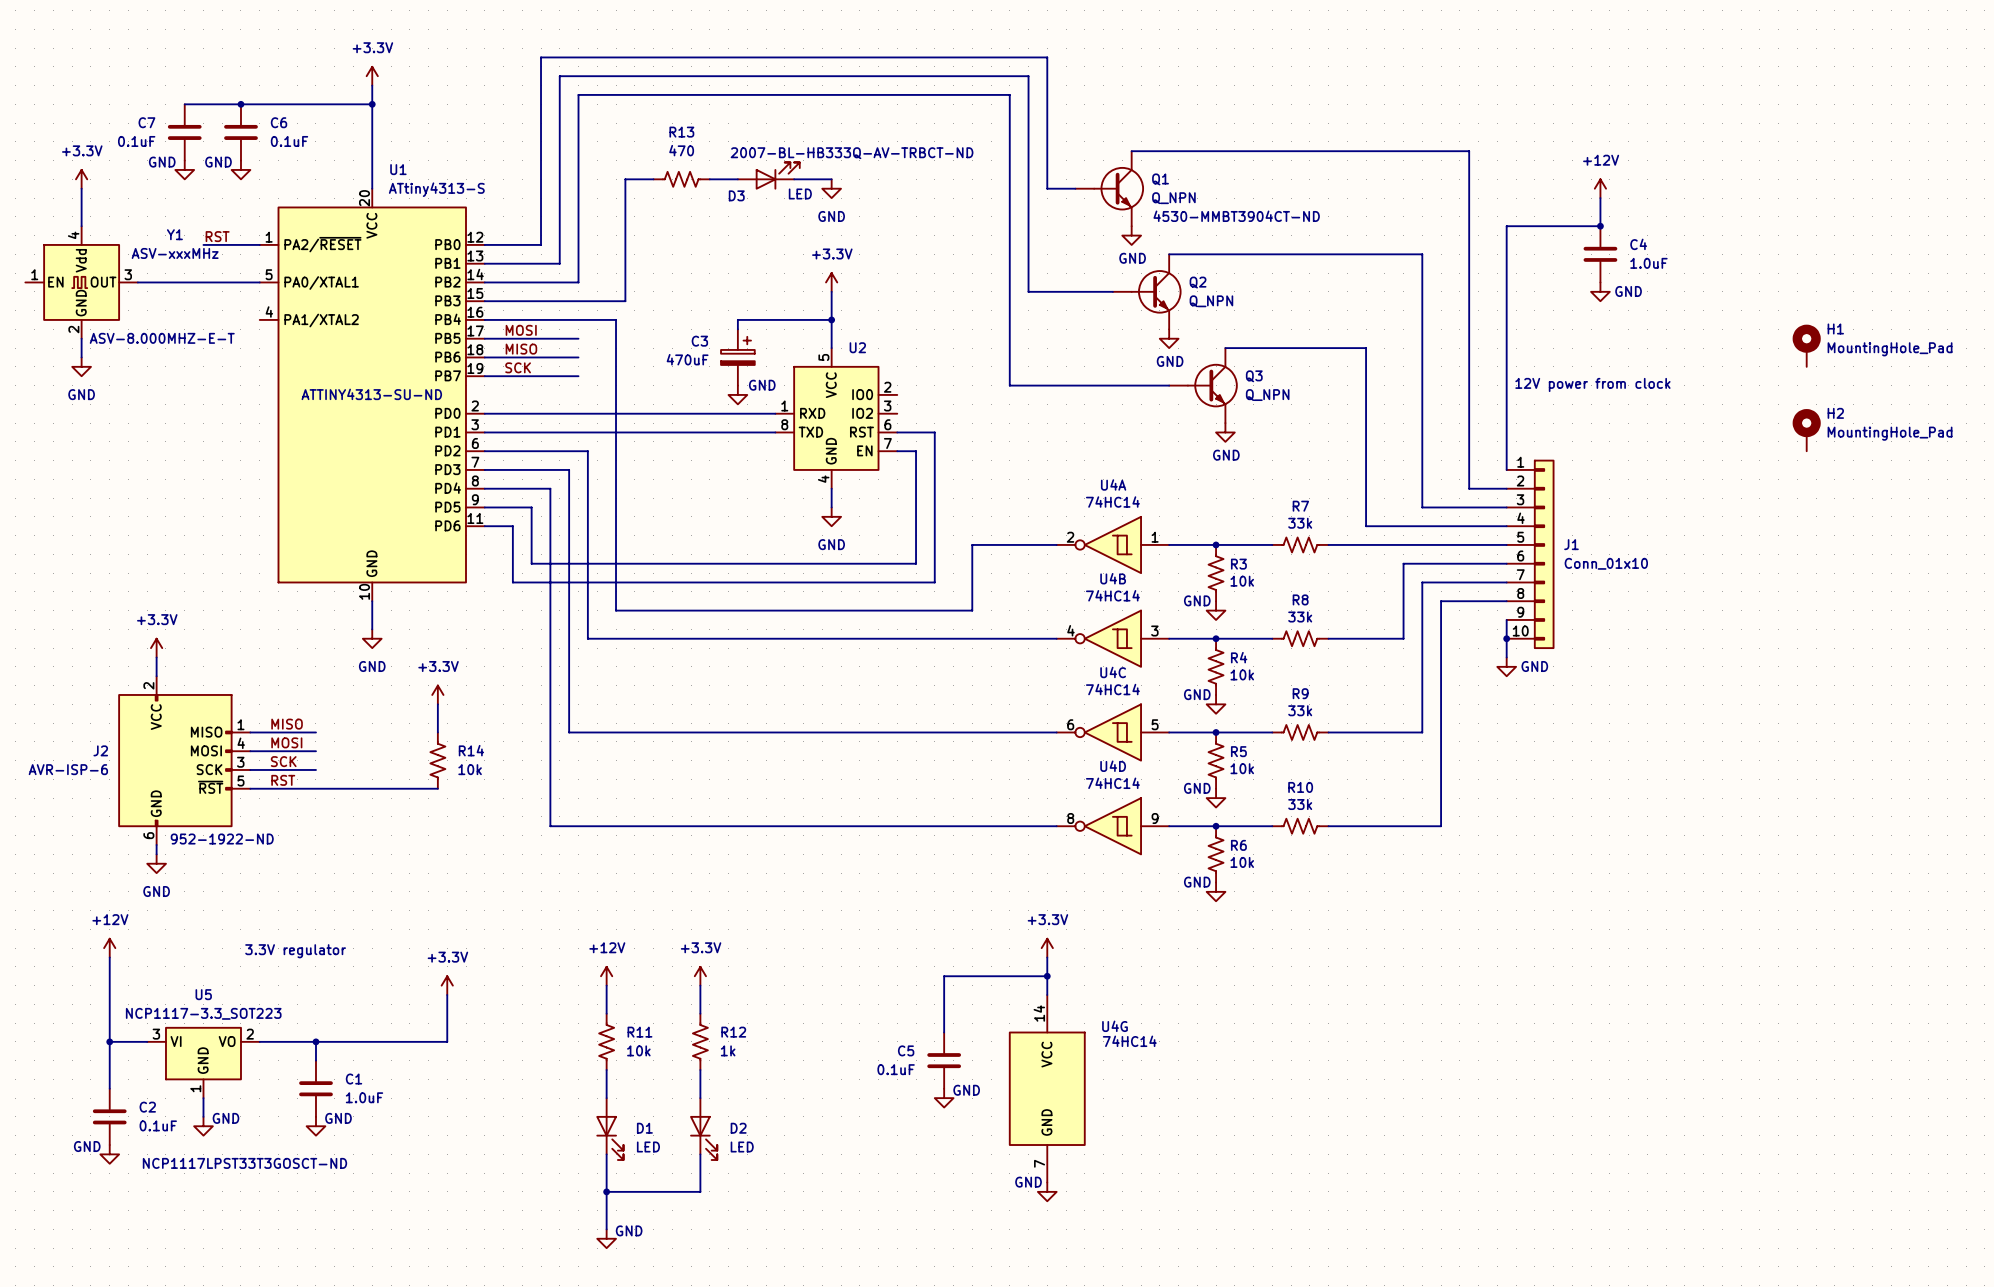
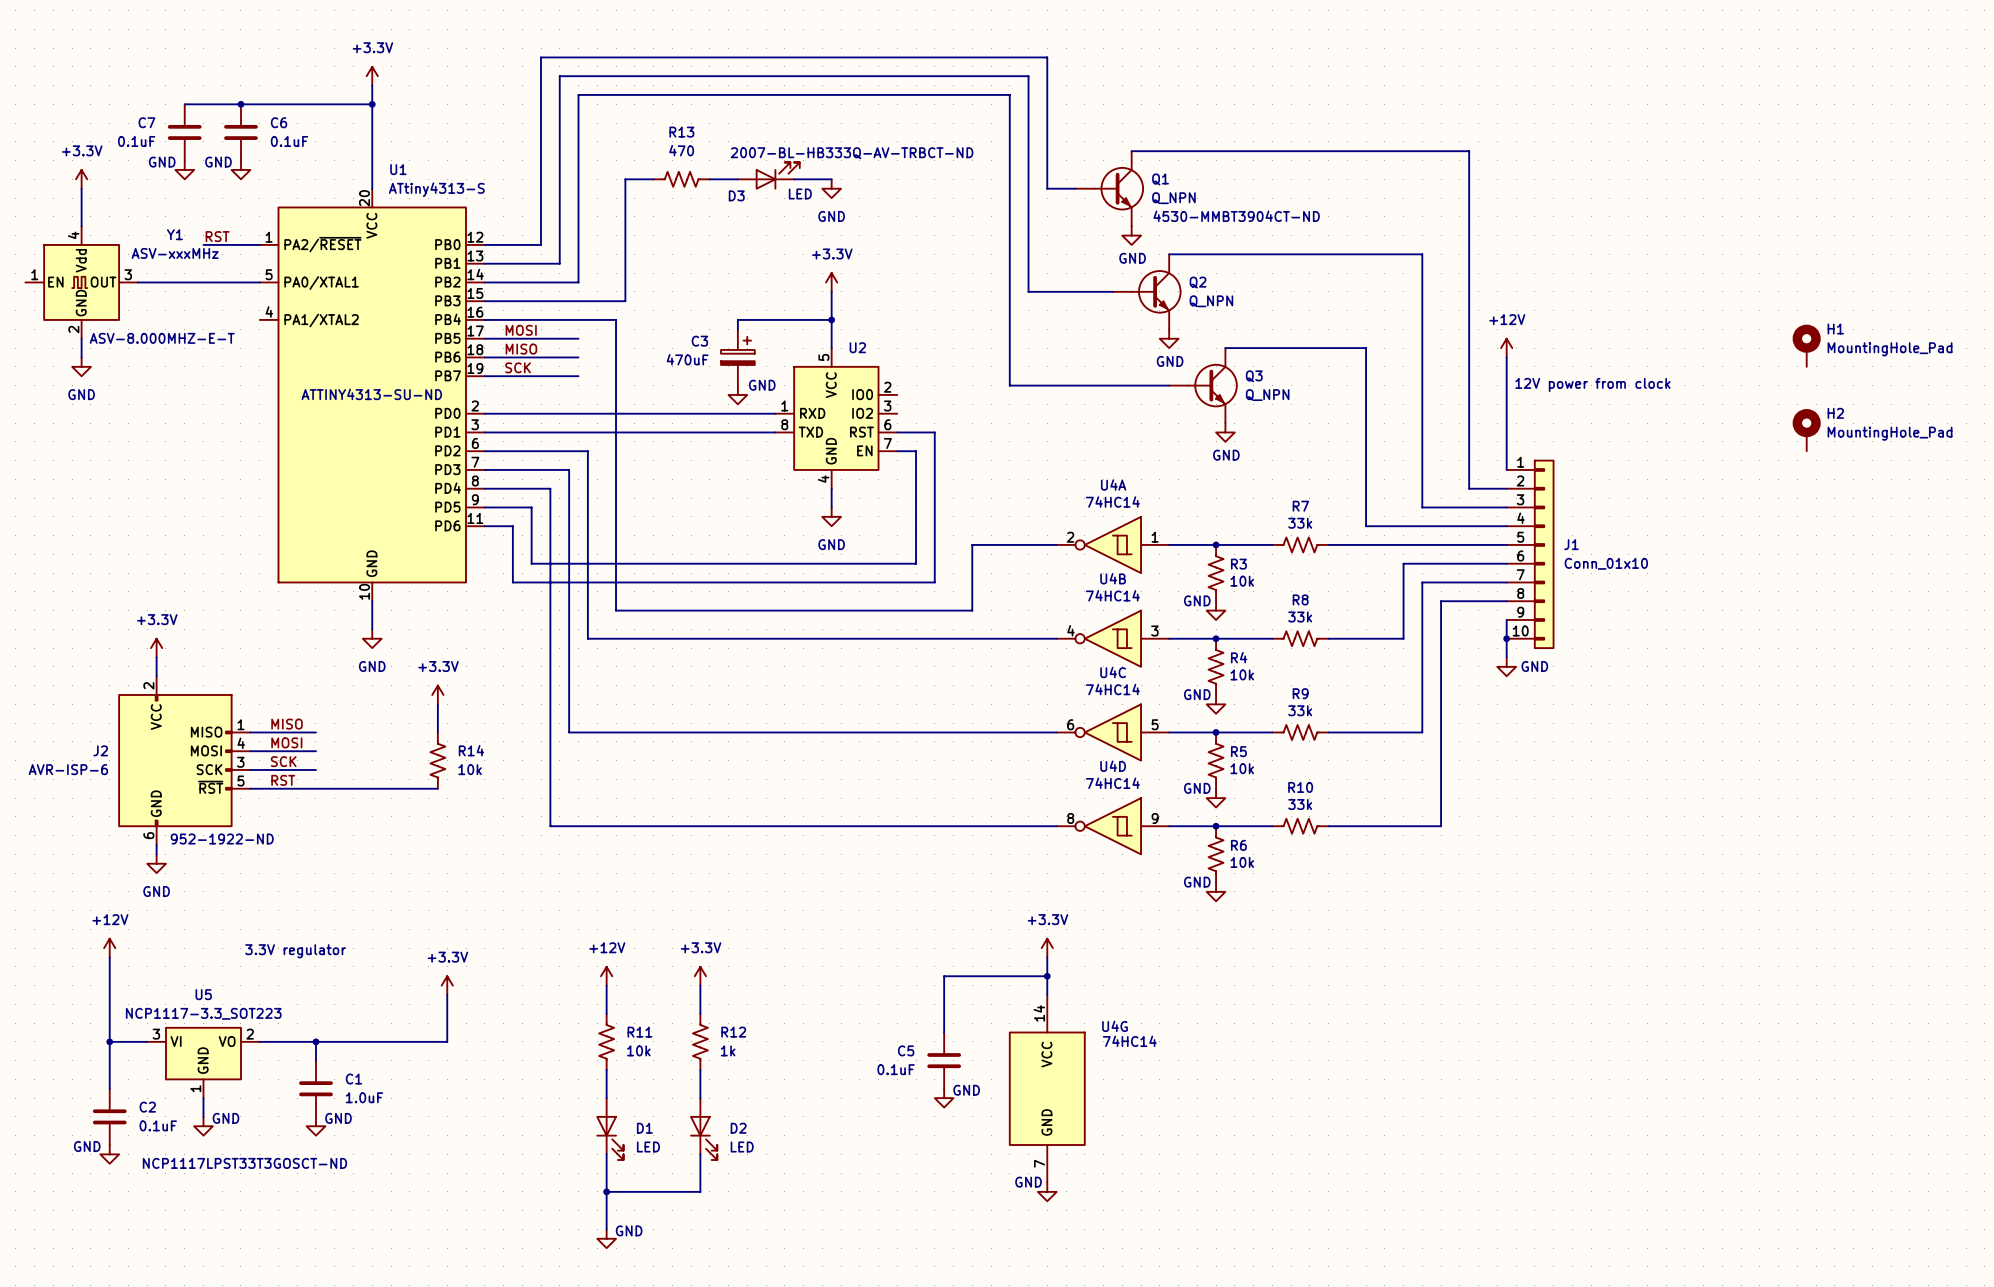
power symbol: +12V (1600, 188) -> none
wire: (1600, 198) (1600, 226) (1506, 226) (1506, 357) -> none
junction: (1600, 226) -> none
C4: 1.0uF (1600, 254) -> none
power symbol: GND (1600, 291) -> none
power symbol: none -> +12V (1506, 348)

